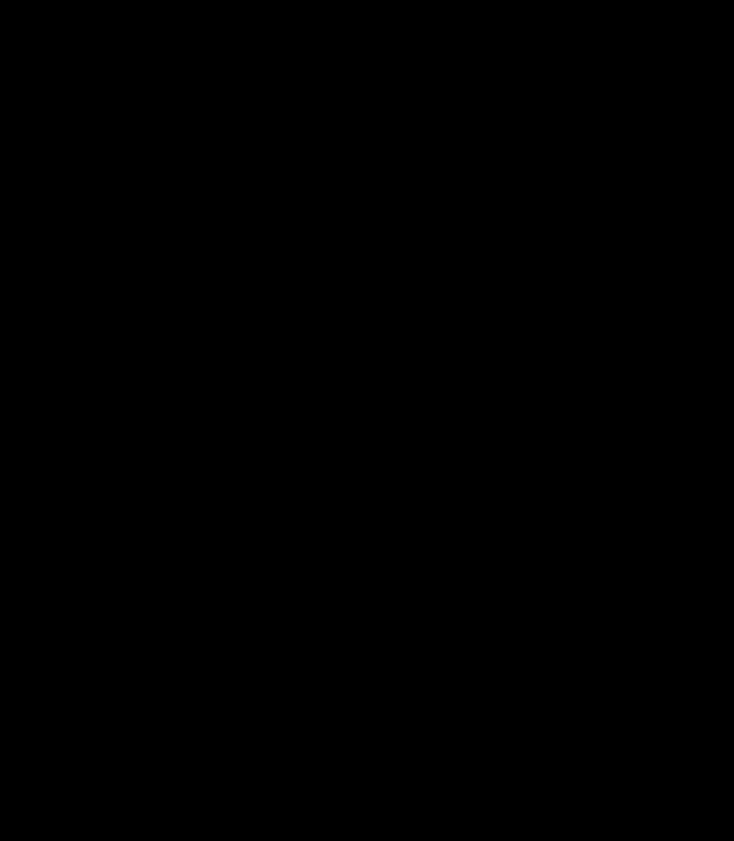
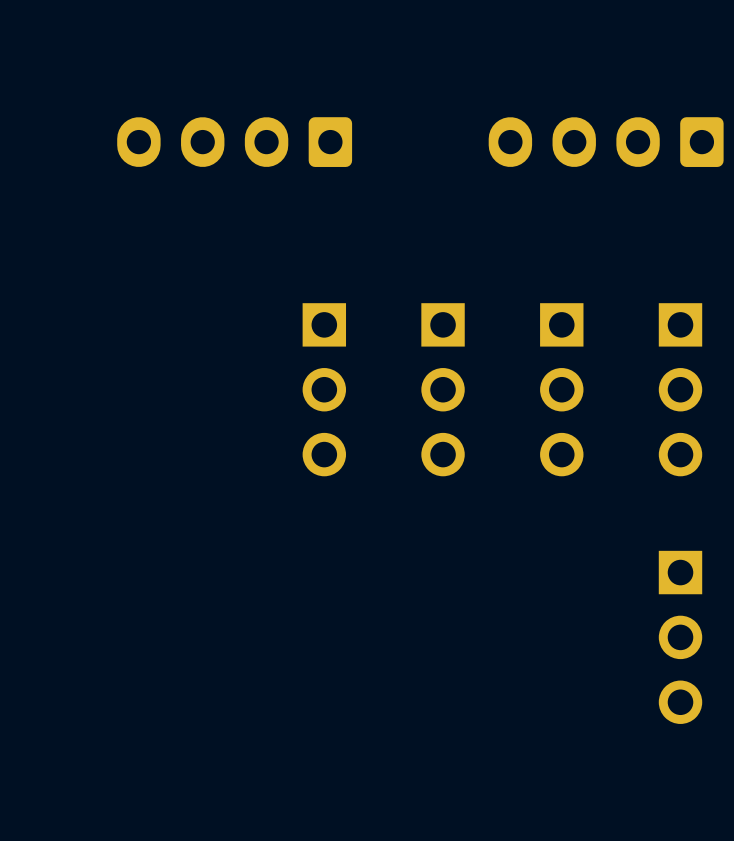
part: none -> (234, 142)
part: none -> (606, 142)
part: none -> (324, 389)
part: none -> (443, 389)
part: none -> (561, 389)
part: none -> (680, 389)
part: none -> (680, 637)

